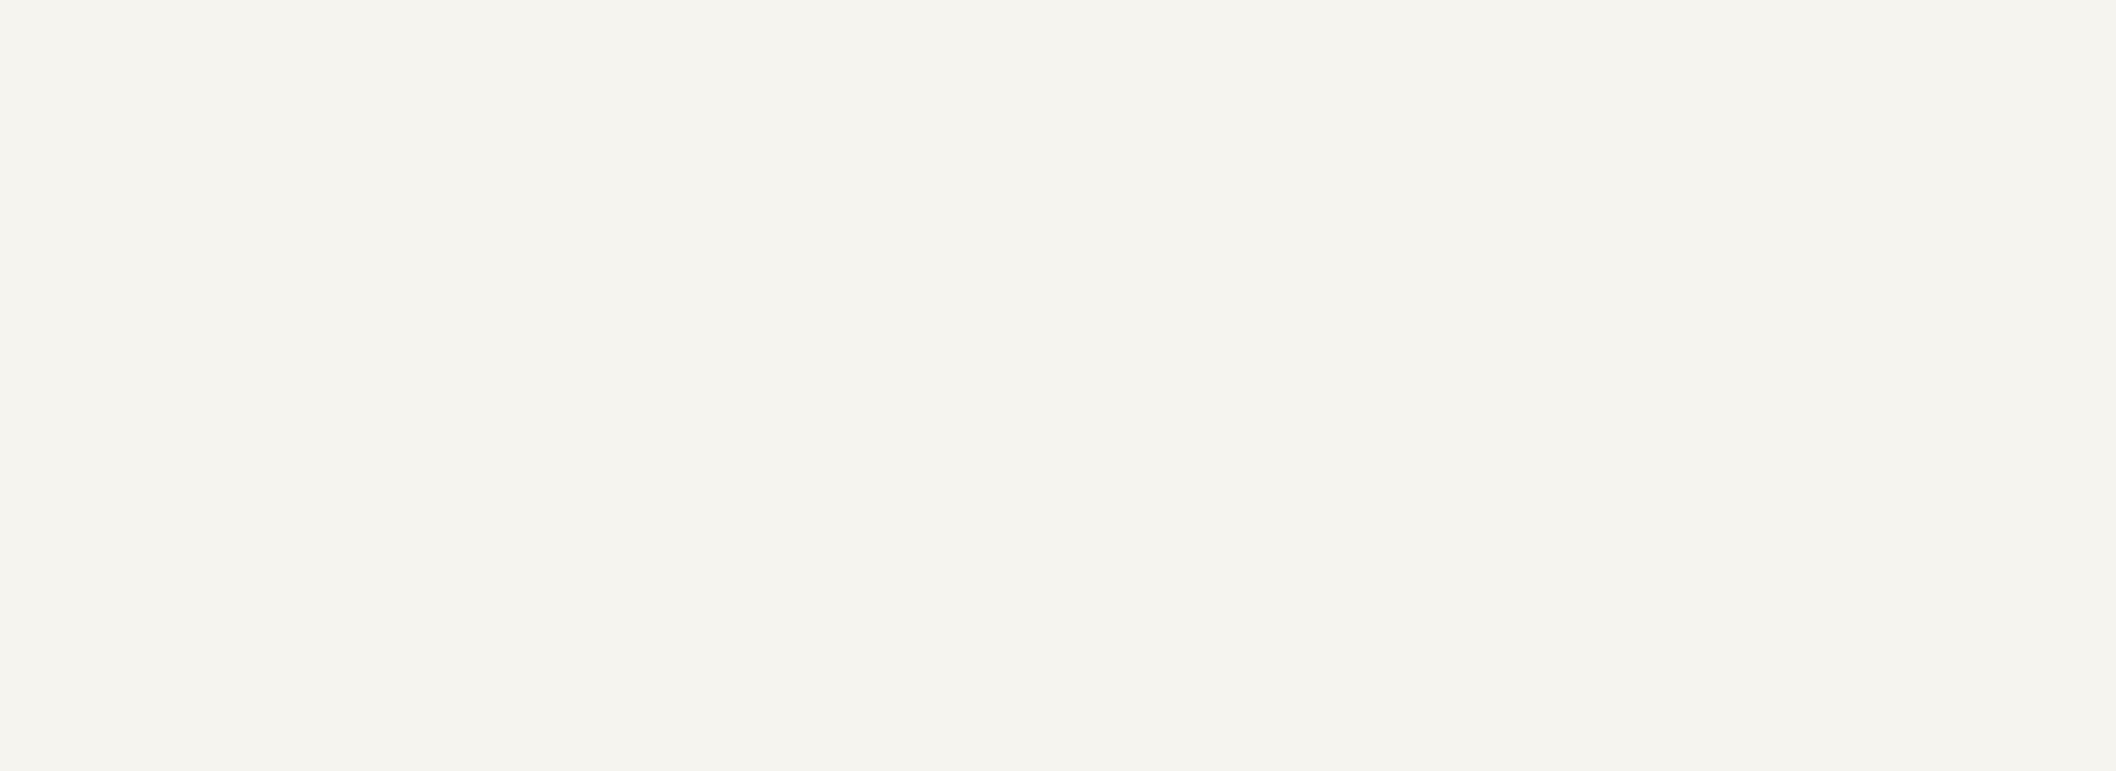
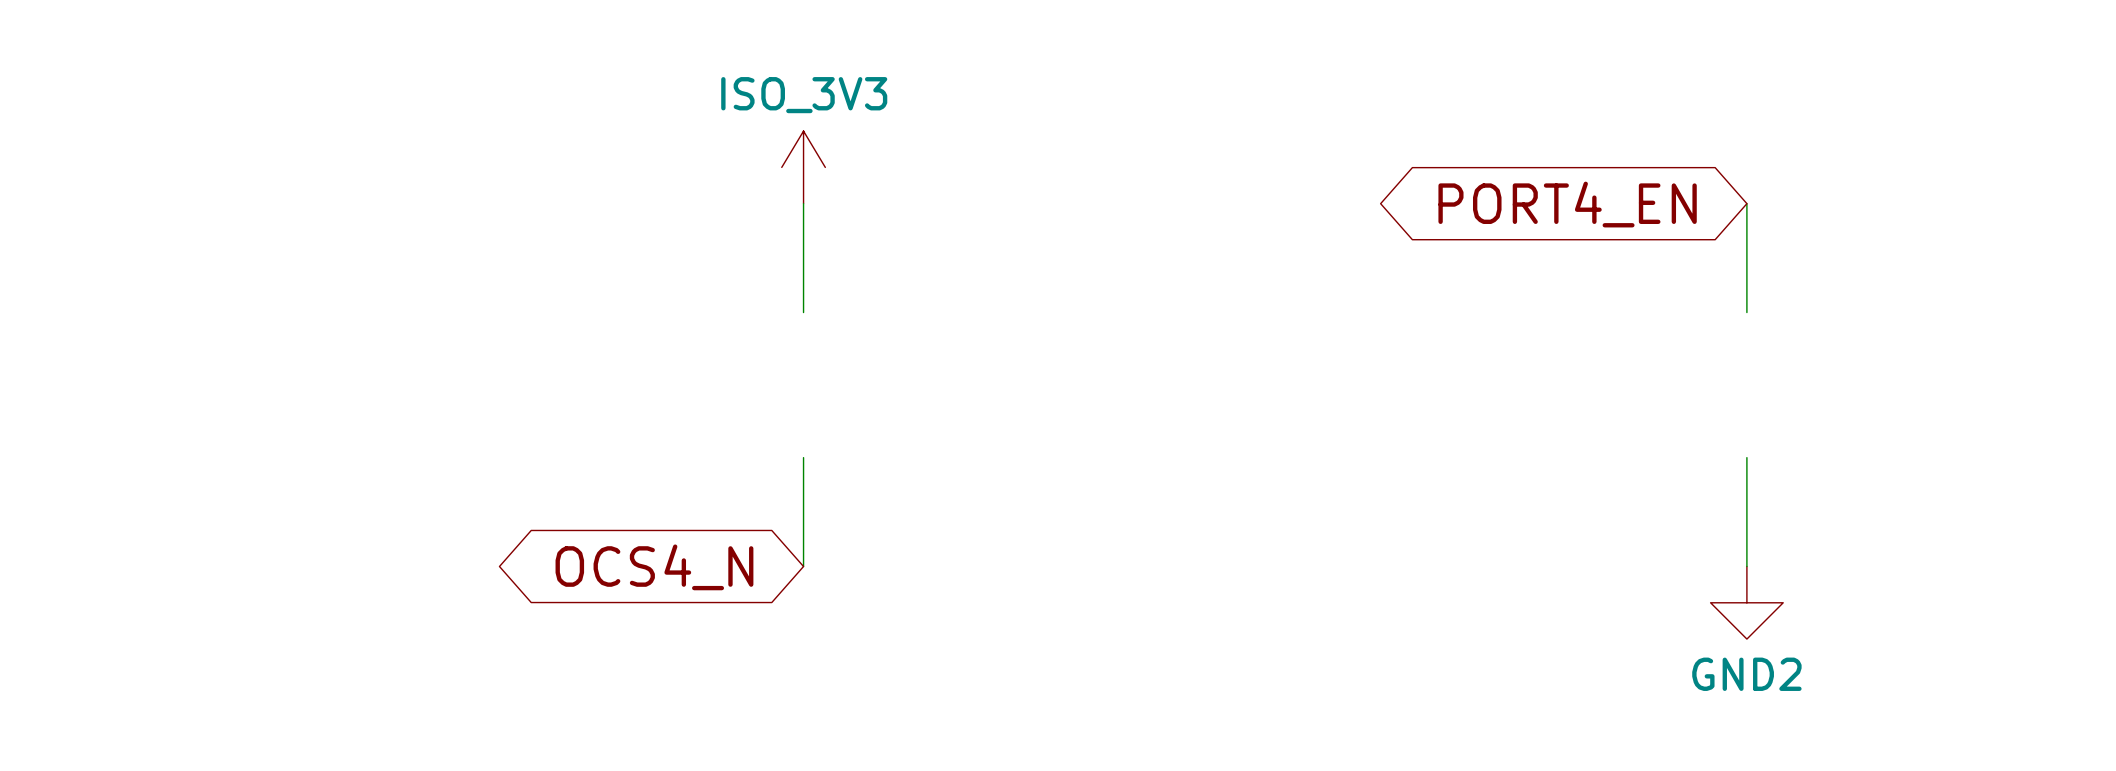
power symbol: none -> ISO_3V3 (803, 167)
wire: none -> (803, 203) (803, 312)
wire: none -> (1746, 203) (1746, 312)
global label: none -> PORT4_EN (1567, 204)
wire: none -> (803, 457) (803, 566)
wire: none -> (1746, 457) (1746, 566)
global label: none -> OCS4_N (654, 567)
power symbol: none -> GND2 (1746, 602)

